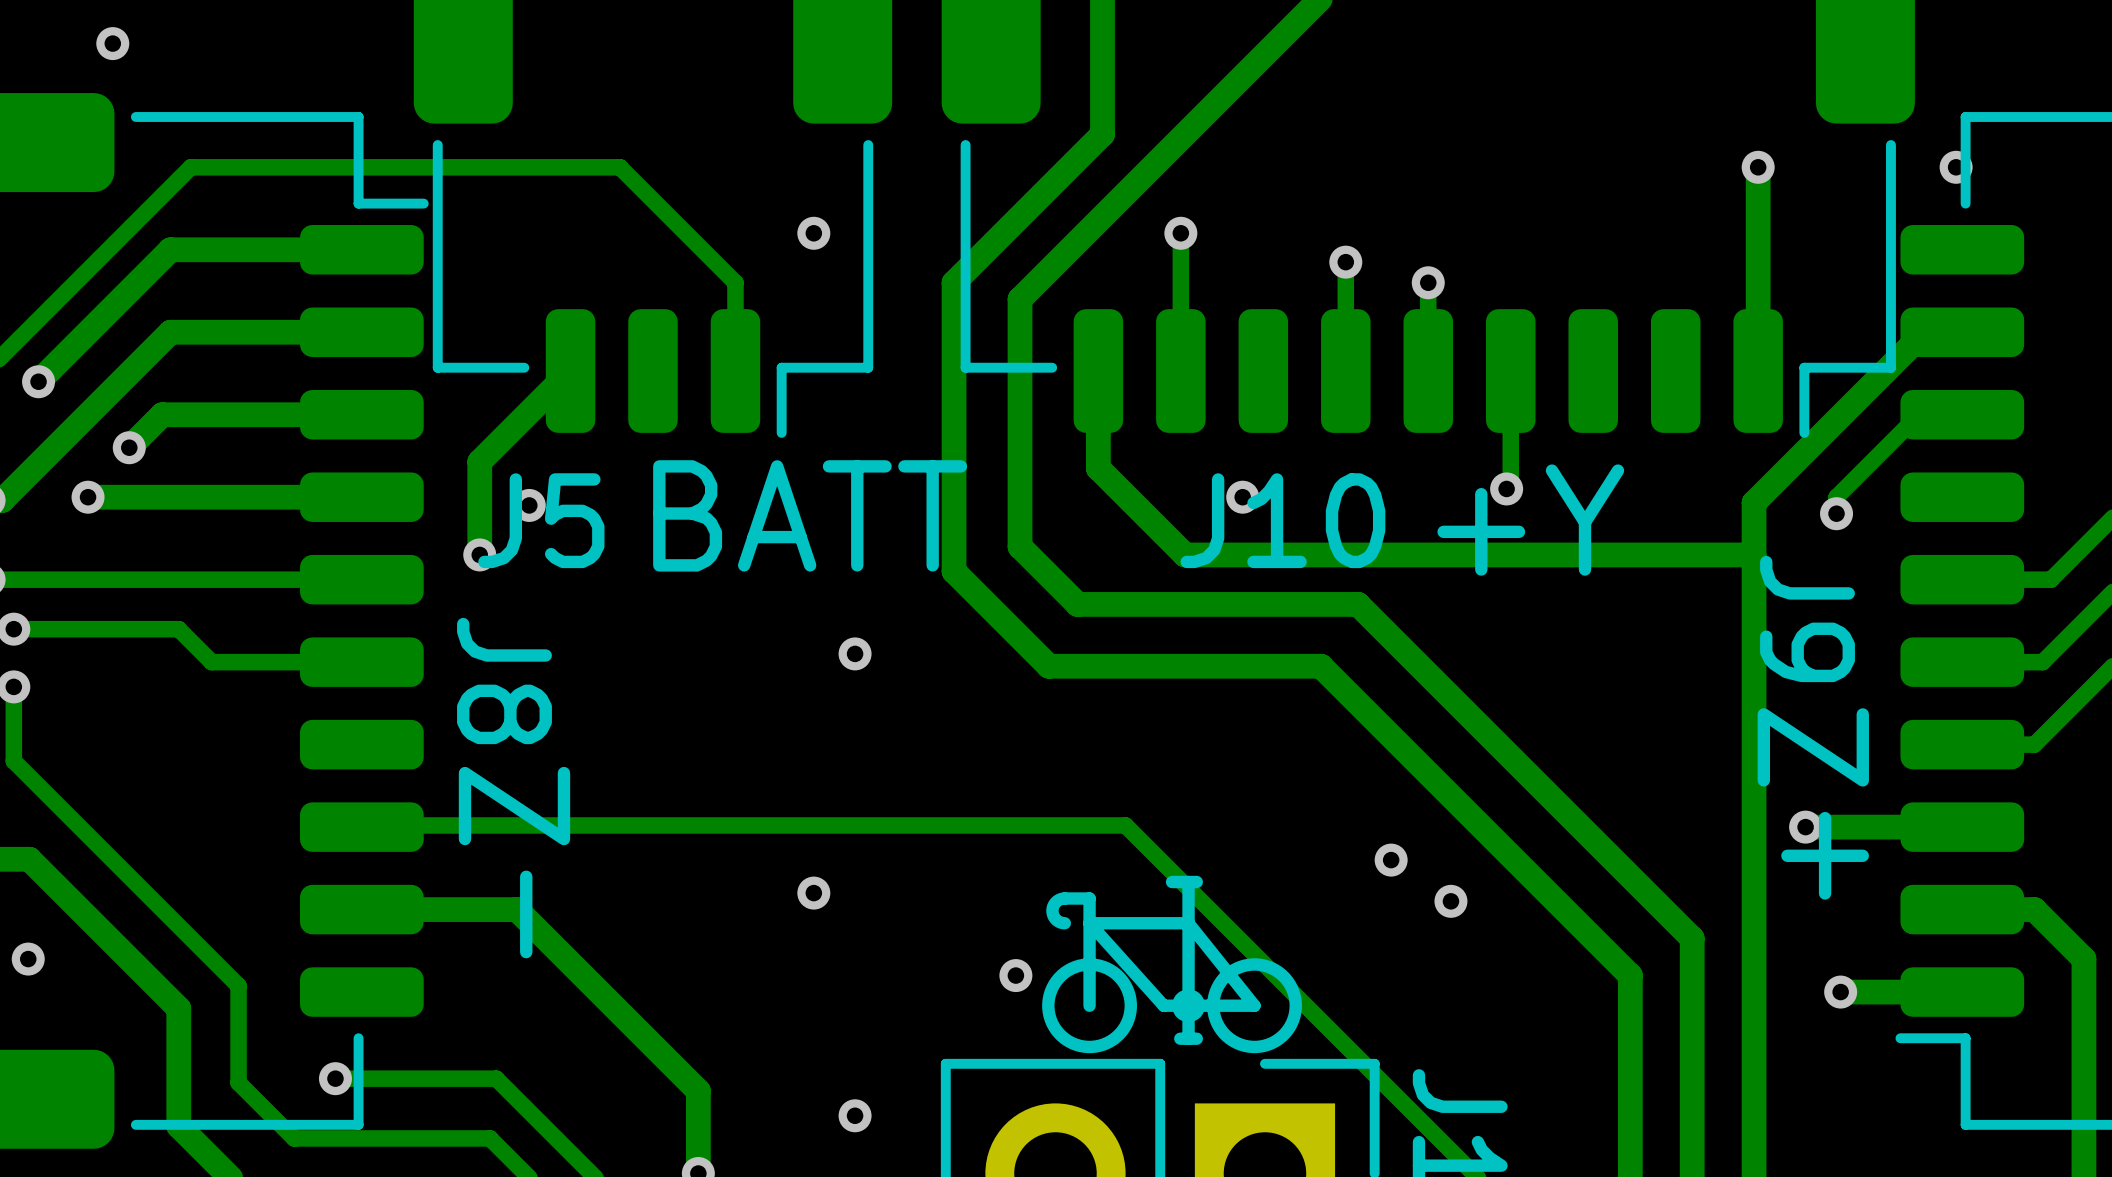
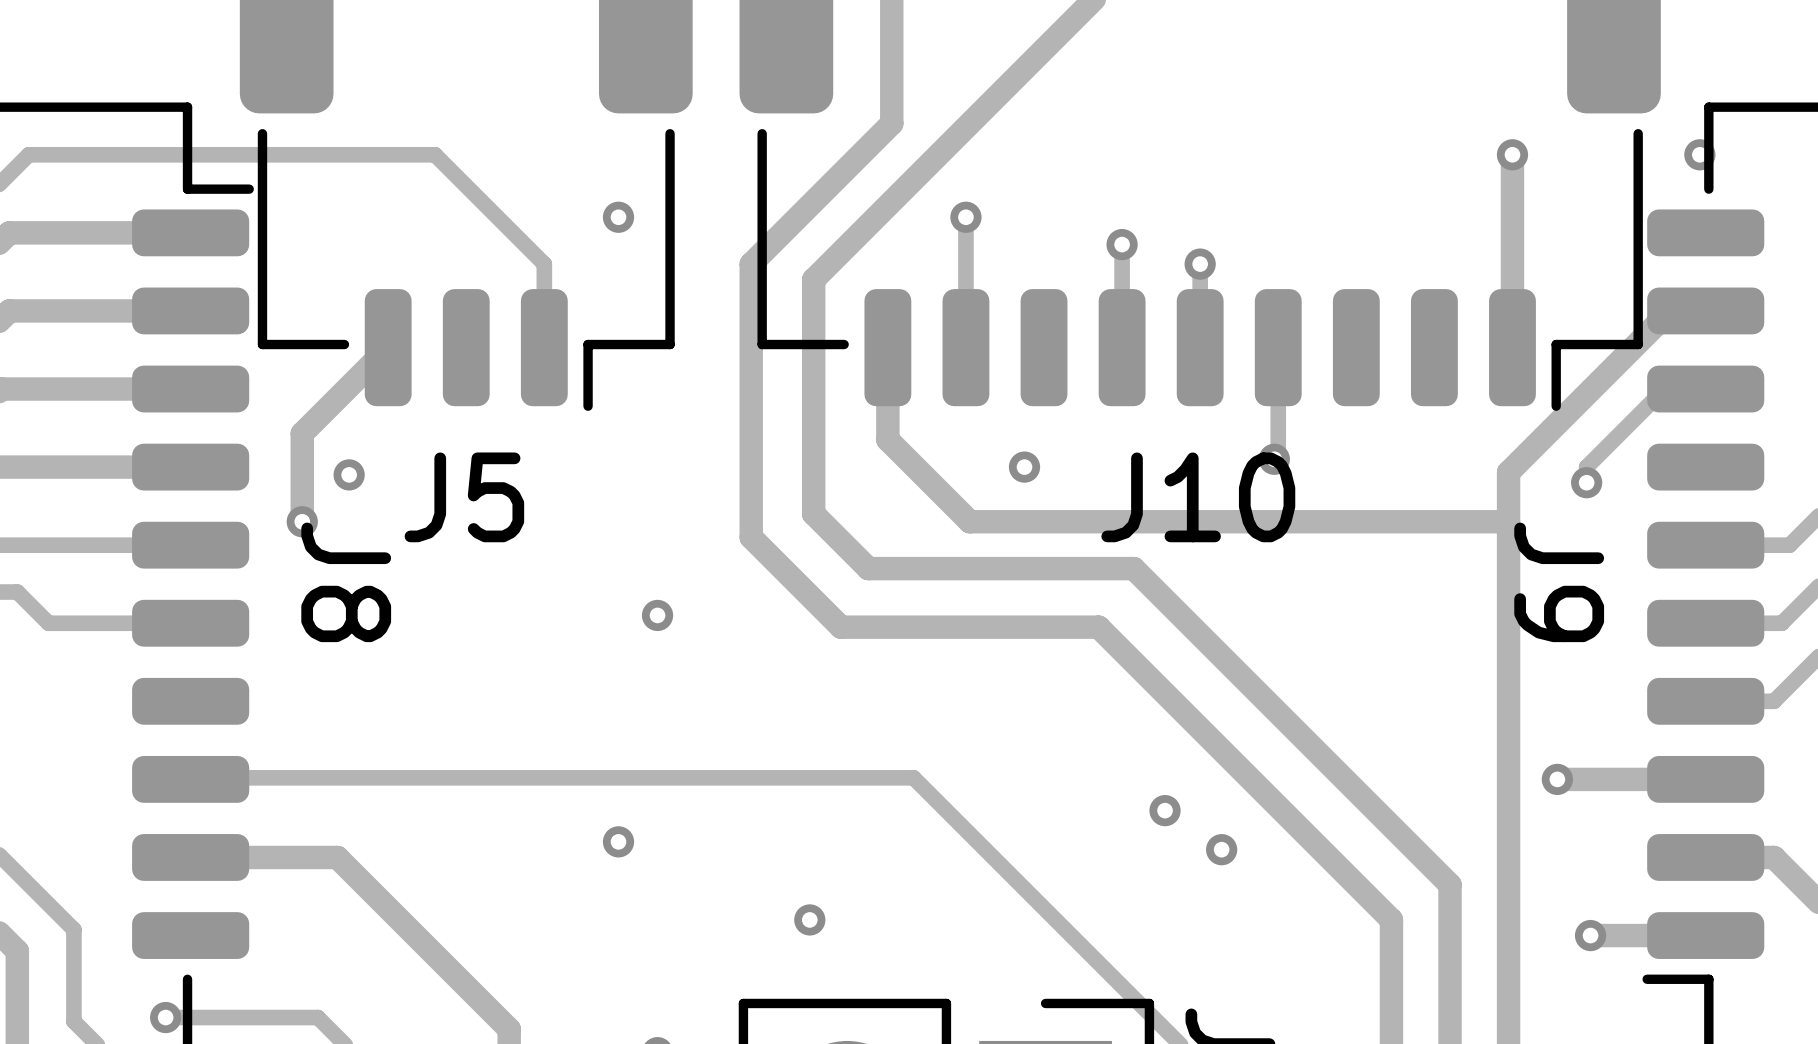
text: BATT (810, 515) -> none
J5 name position: J5 (541, 520) -> J5 (464, 497)
J10 name position: J10 (1282, 520) -> J10 (1198, 497)
text: +Y (1530, 520) -> none
J8 name position: J8 (504, 681) -> J8 (346, 582)
text: +Z (1813, 803) -> none
text: -Z (514, 862) -> none
drawing: [1042, 875, 1302, 1054] -> none

